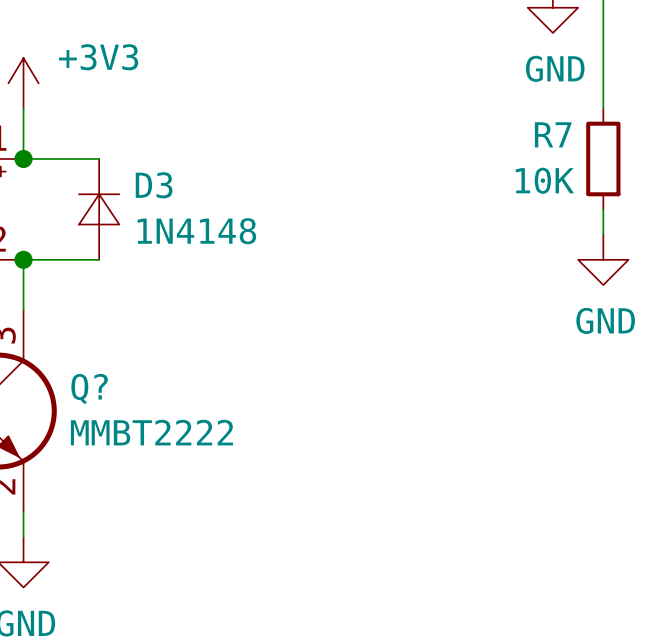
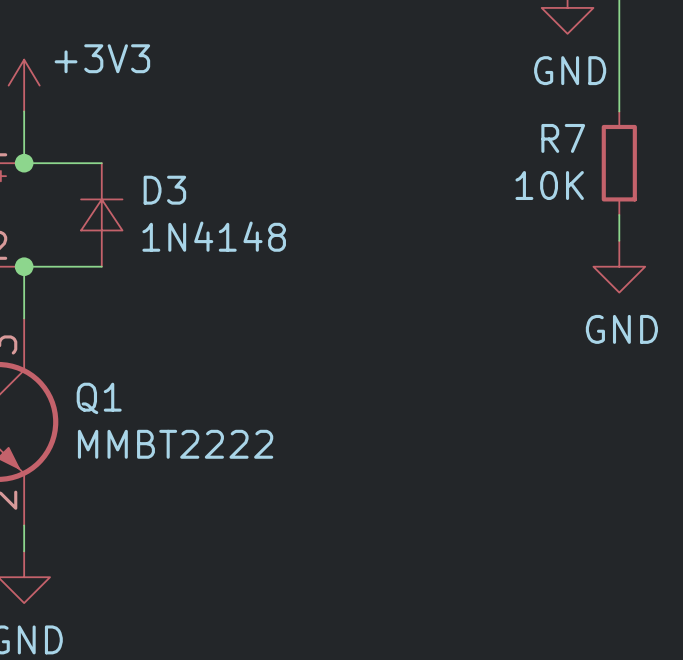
Q? name: Q? (89, 388) -> Q1 (99, 398)

